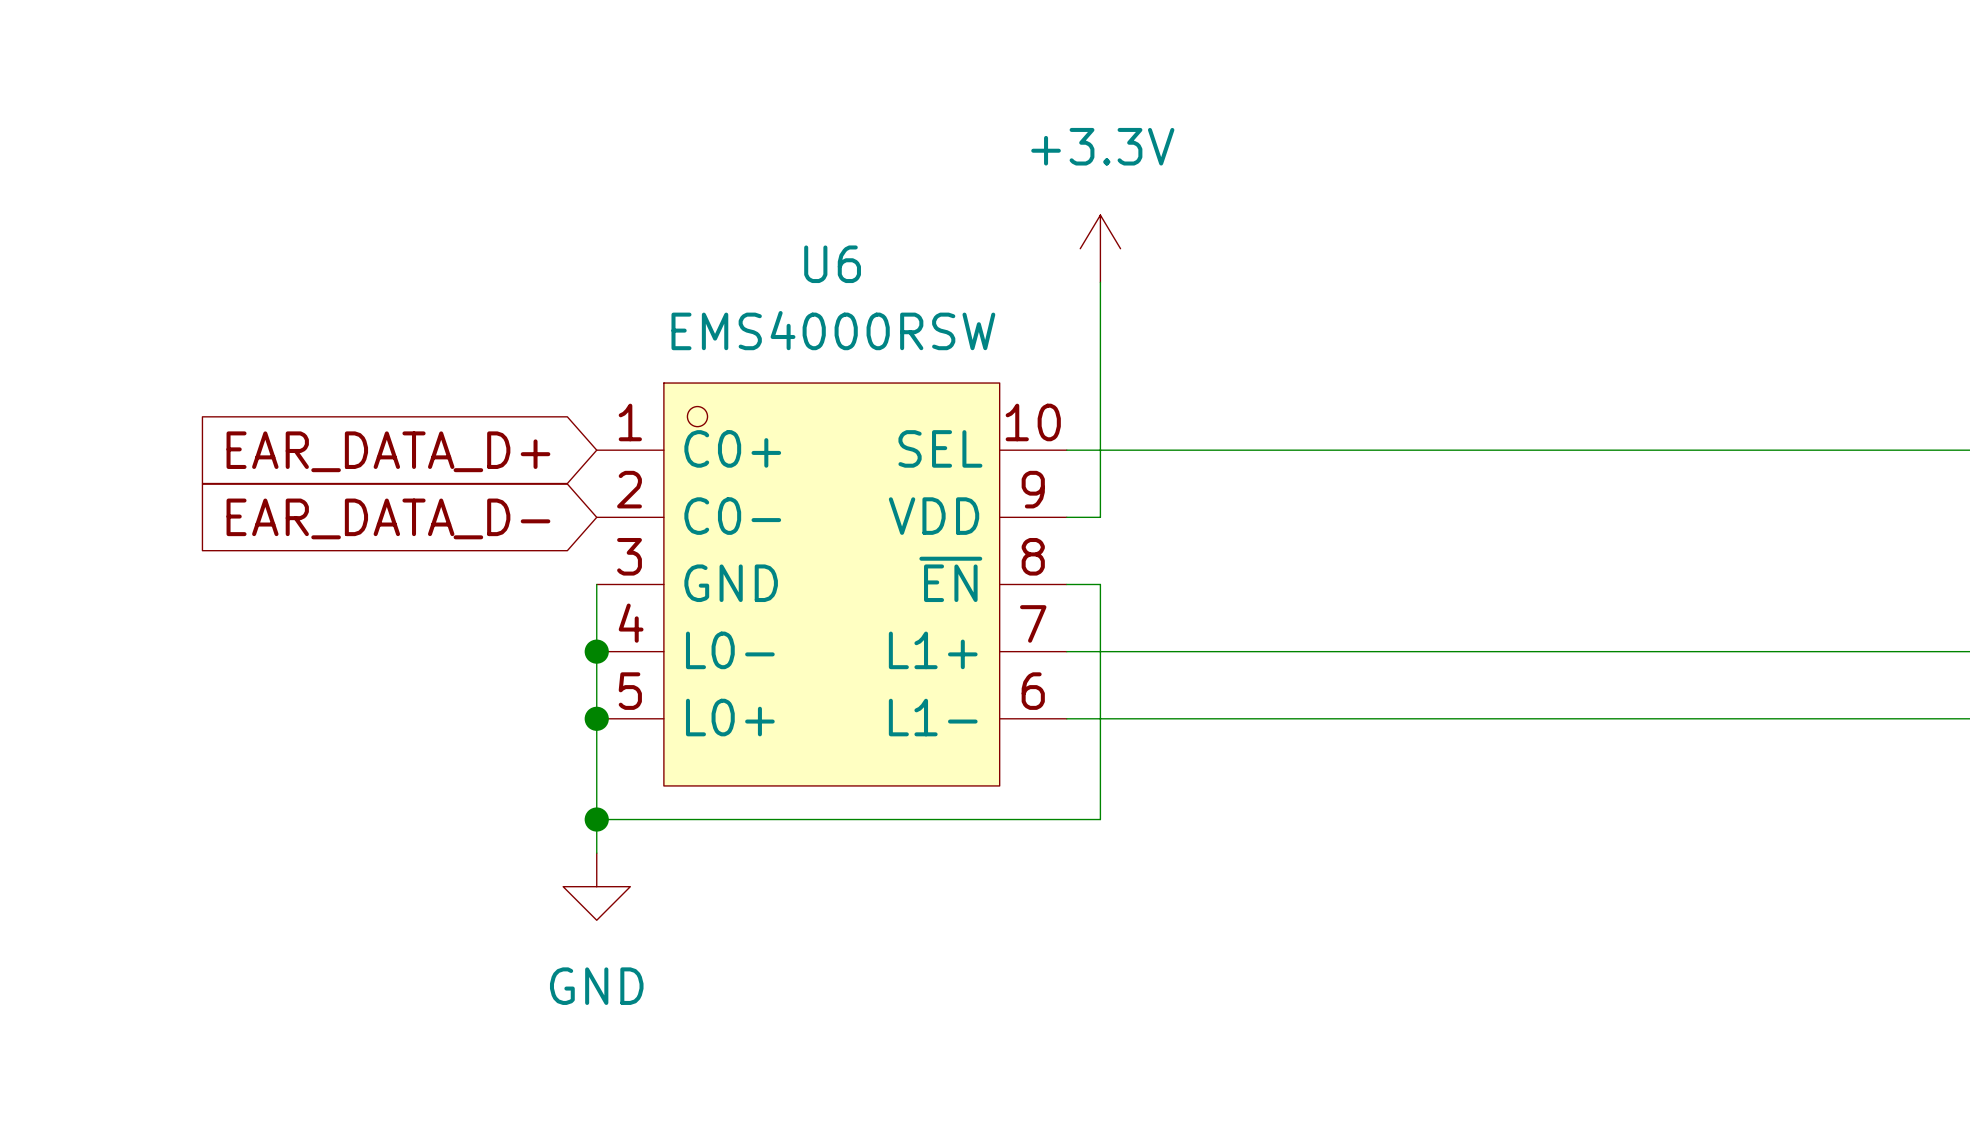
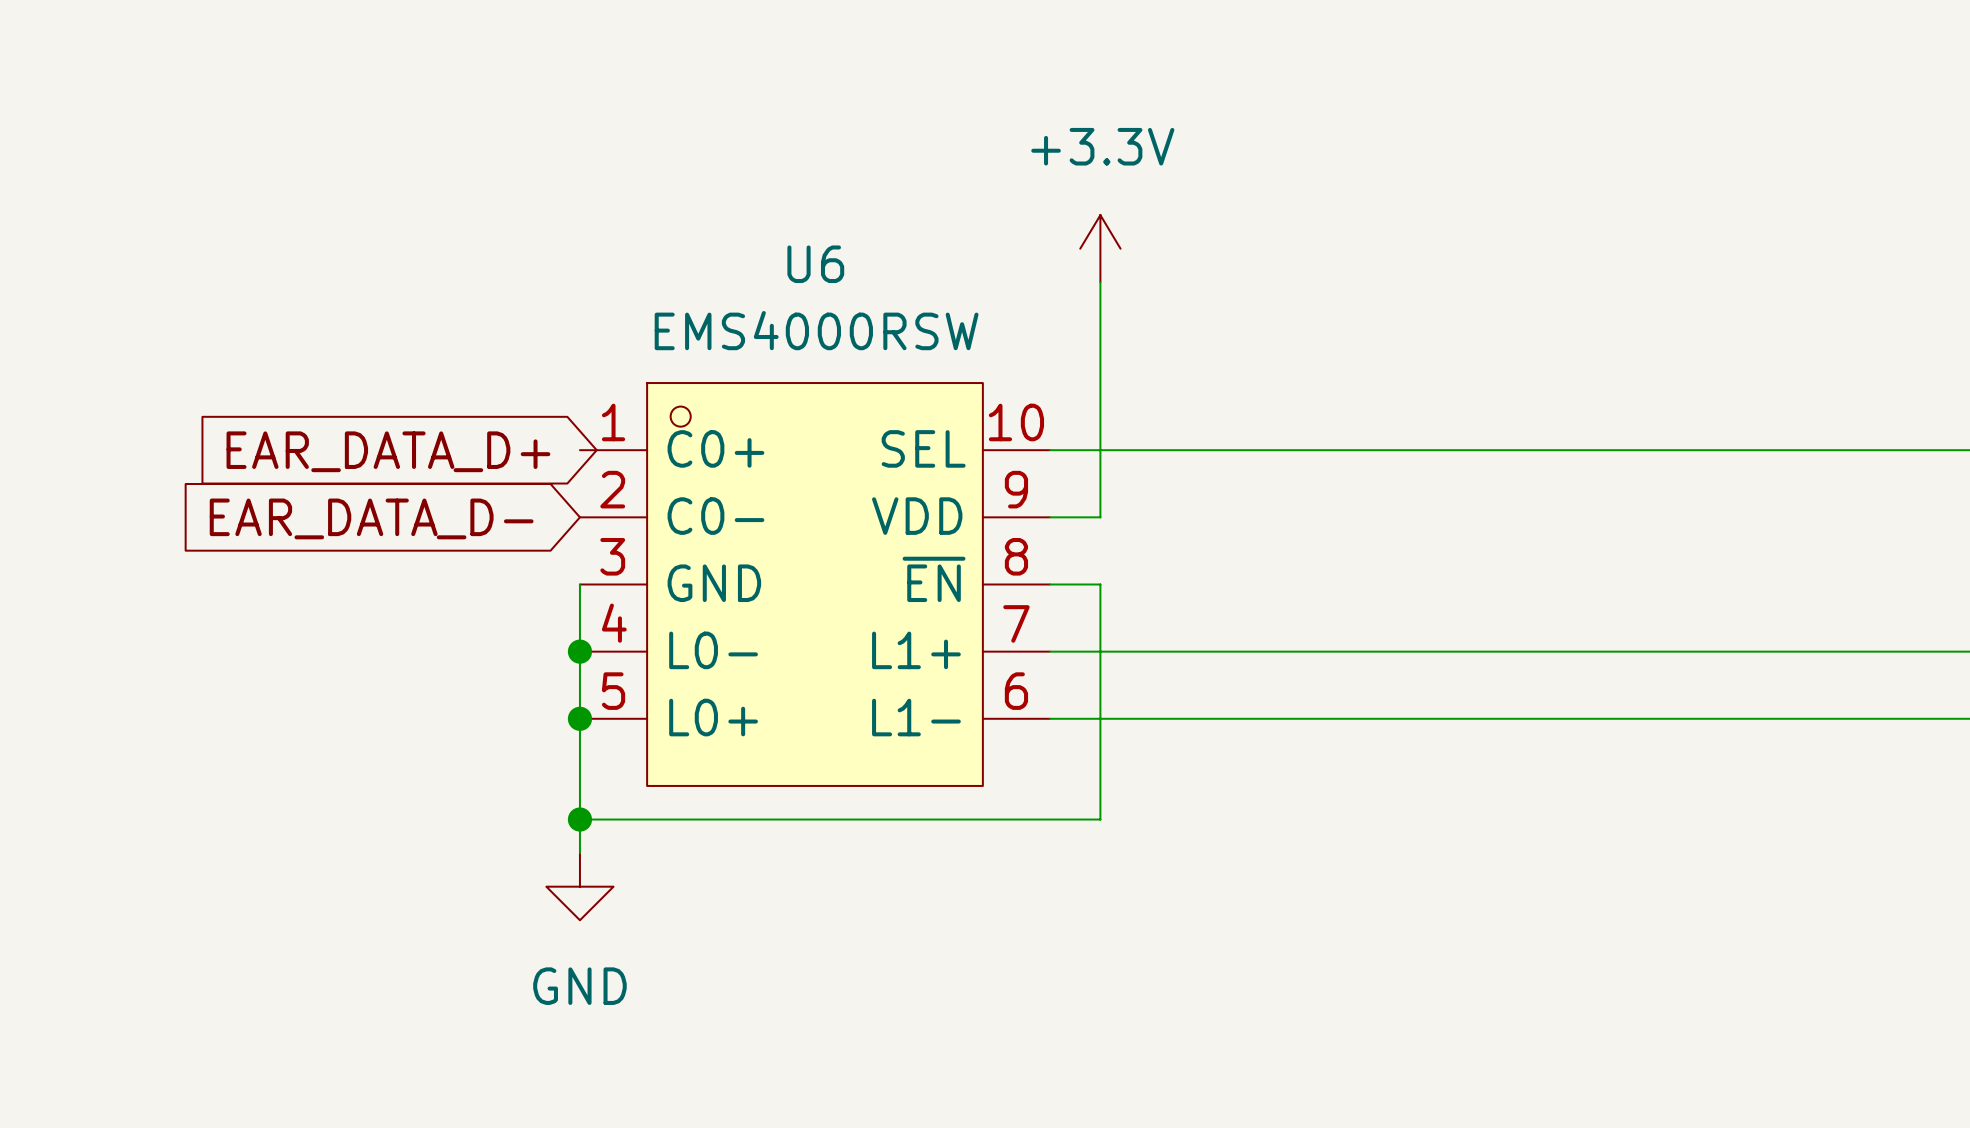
global label position: EAR_DATA_D- (388, 518) -> EAR_DATA_D- (371, 518)
wire: (596, 584) (596, 853) -> (579, 584) (579, 853)
U6 position: (831, 584) -> (814, 584)
junction position: (596, 651) -> (579, 651)
junction position: (596, 718) -> (579, 718)
junction position: (596, 819) -> (579, 819)
power symbol position: GND (596, 886) -> GND (579, 886)

